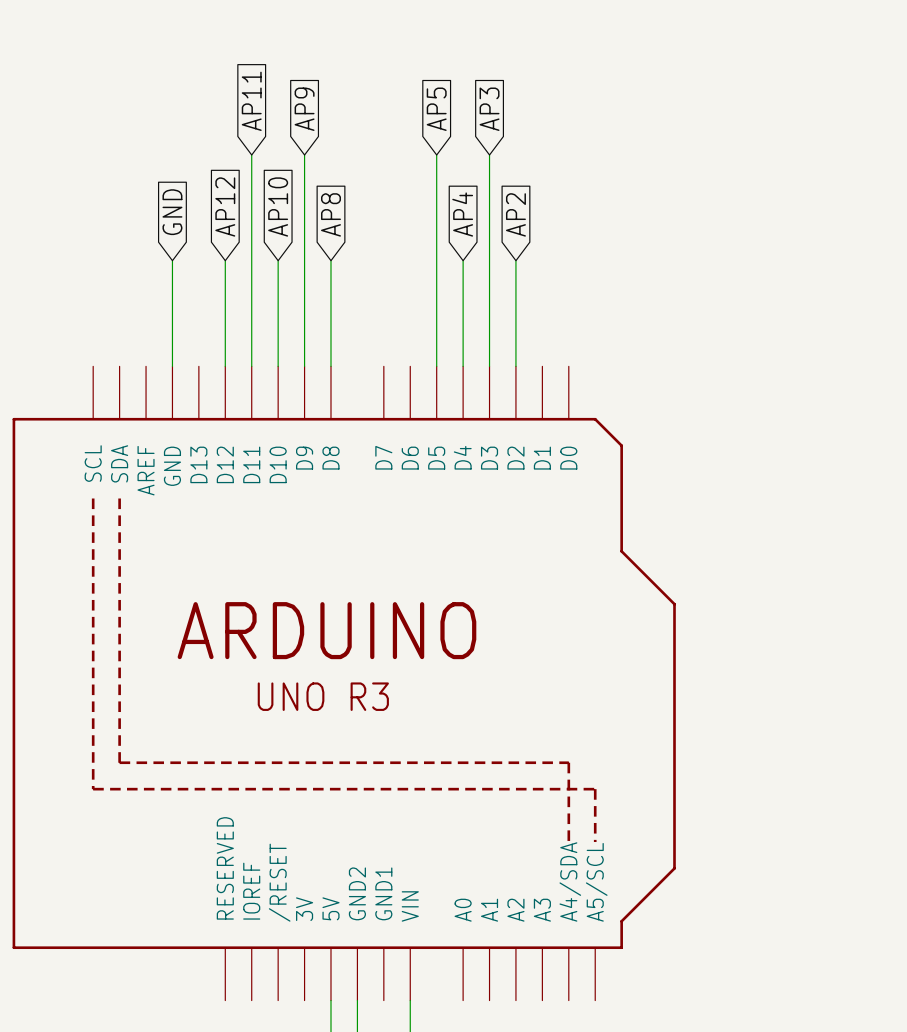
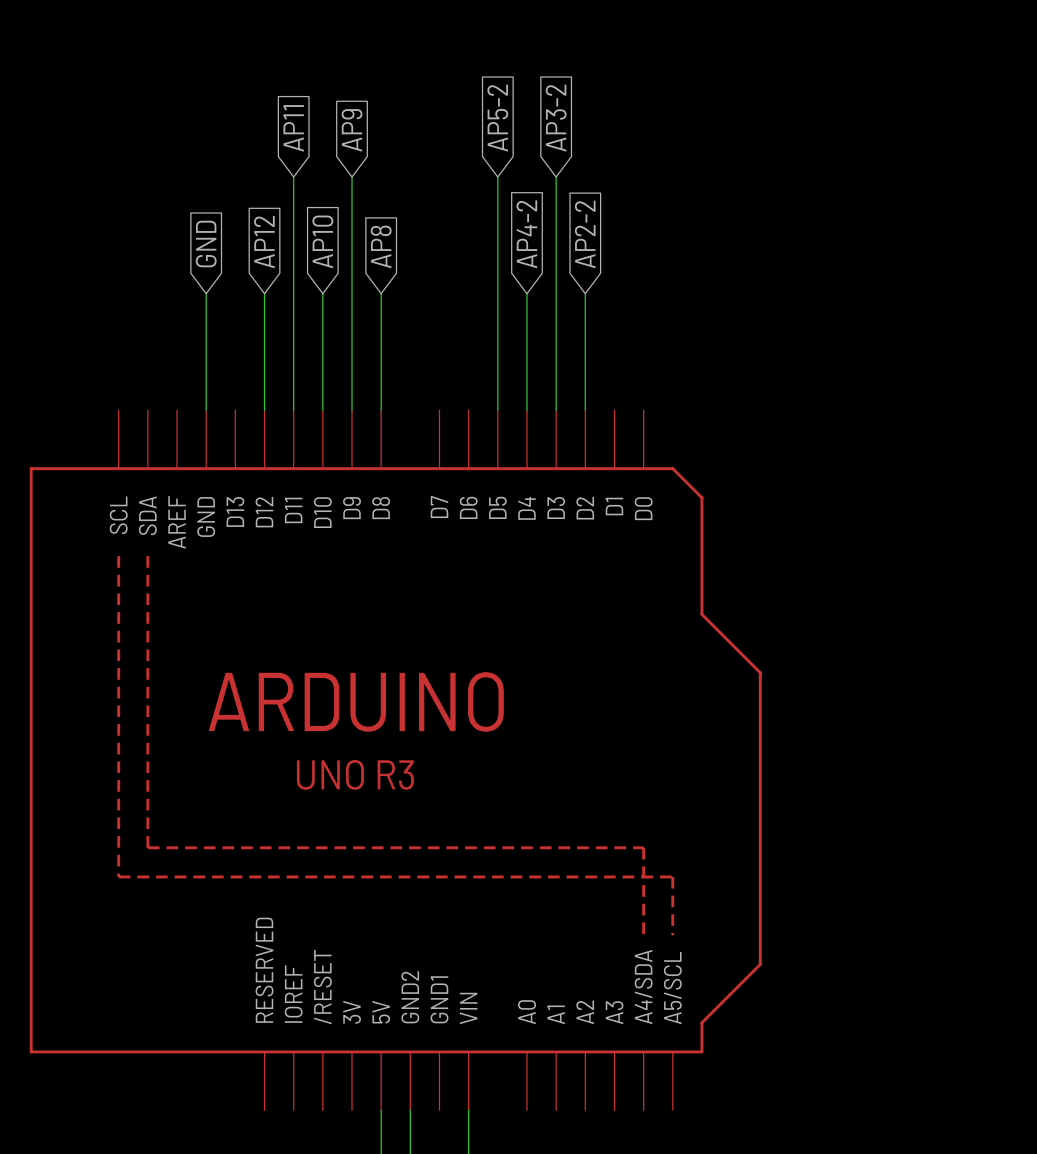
global label: AP5 (436, 109) -> AP5-2 (497, 118)
global label: AP3 (489, 109) -> AP3-2 (556, 118)
global label: AP4 (462, 214) -> AP4-2 (526, 234)
global label: AP2 (515, 214) -> AP2-2 (585, 234)

